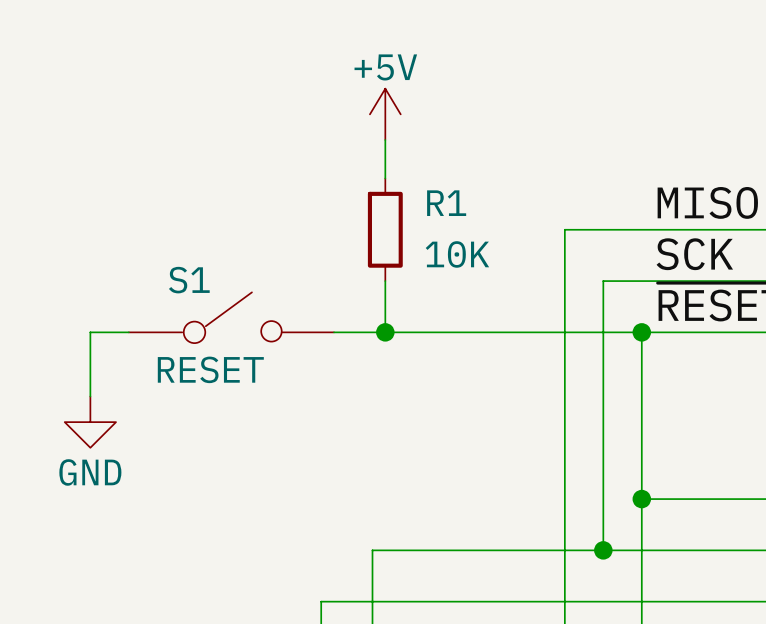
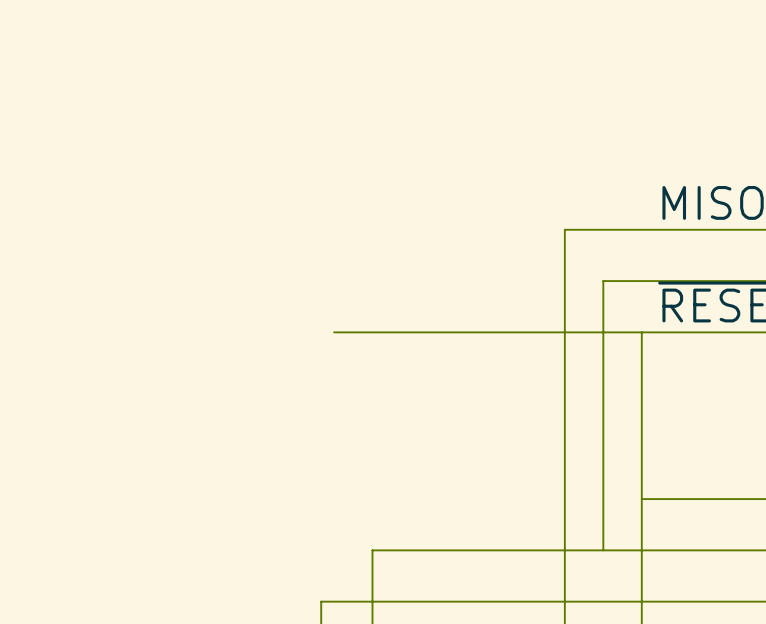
power symbol: +5V (385, 114) -> none
wire: (385, 140) (385, 178) -> none
R1: 10K (385, 229) -> none
label: SCK (694, 254) -> none
wire: (385, 281) (385, 332) -> none
S1: RESET (231, 317) -> none
wire: (128, 332) (90, 332) (90, 396) -> none
junction: (385, 332) -> none
junction: (641, 332) -> none
power symbol: GND (90, 422) -> none
junction: (641, 499) -> none
junction: (603, 550) -> none

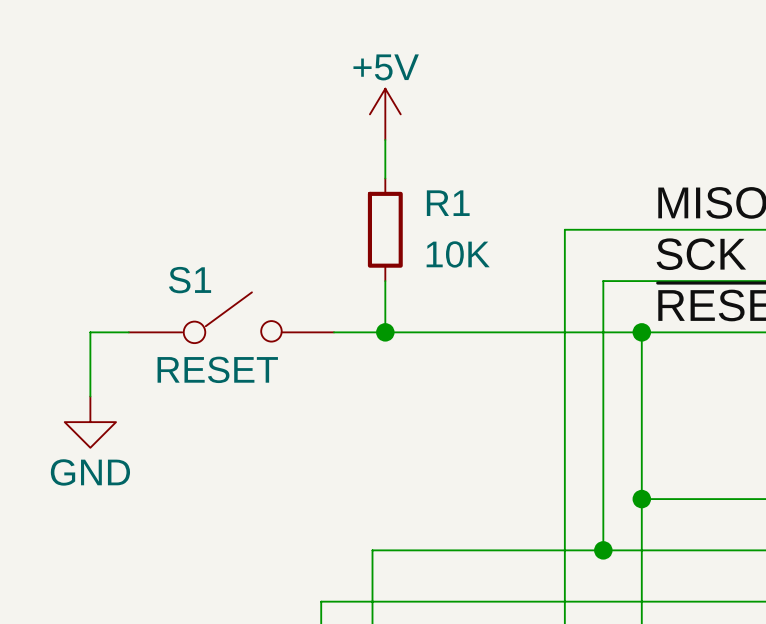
power symbol: none -> +5V (385, 114)
wire: none -> (385, 140) (385, 178)
R1: none -> 10K (385, 229)
label: none -> SCK (701, 254)
wire: none -> (385, 281) (385, 332)
S1: none -> RESET (231, 317)
wire: none -> (128, 332) (90, 332) (90, 396)
junction: none -> (385, 332)
junction: none -> (641, 332)
power symbol: none -> GND (90, 422)
junction: none -> (641, 499)
junction: none -> (603, 550)

